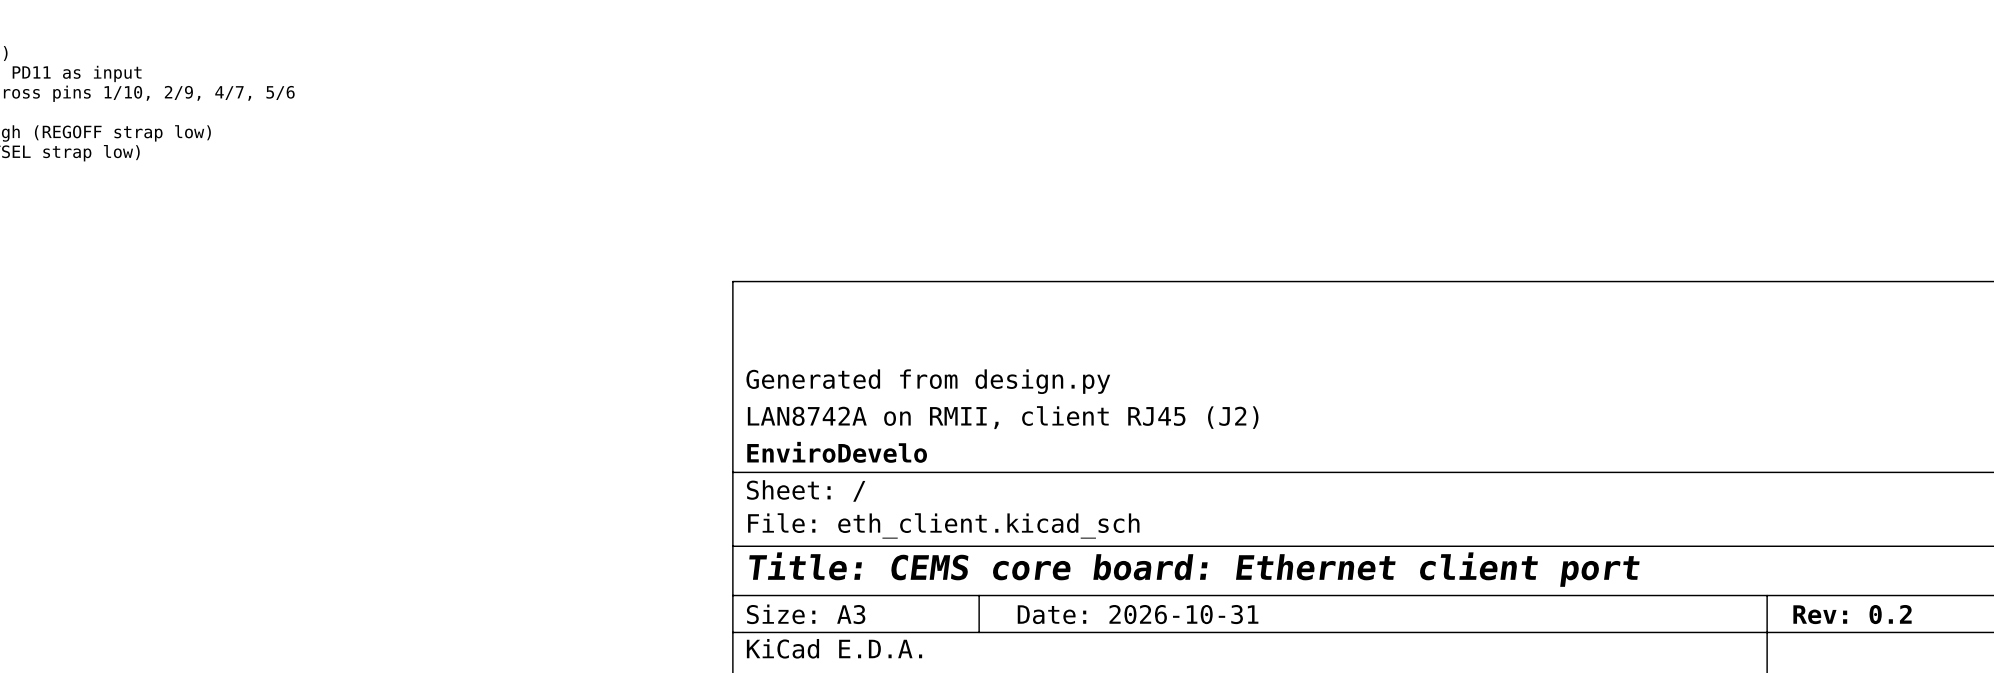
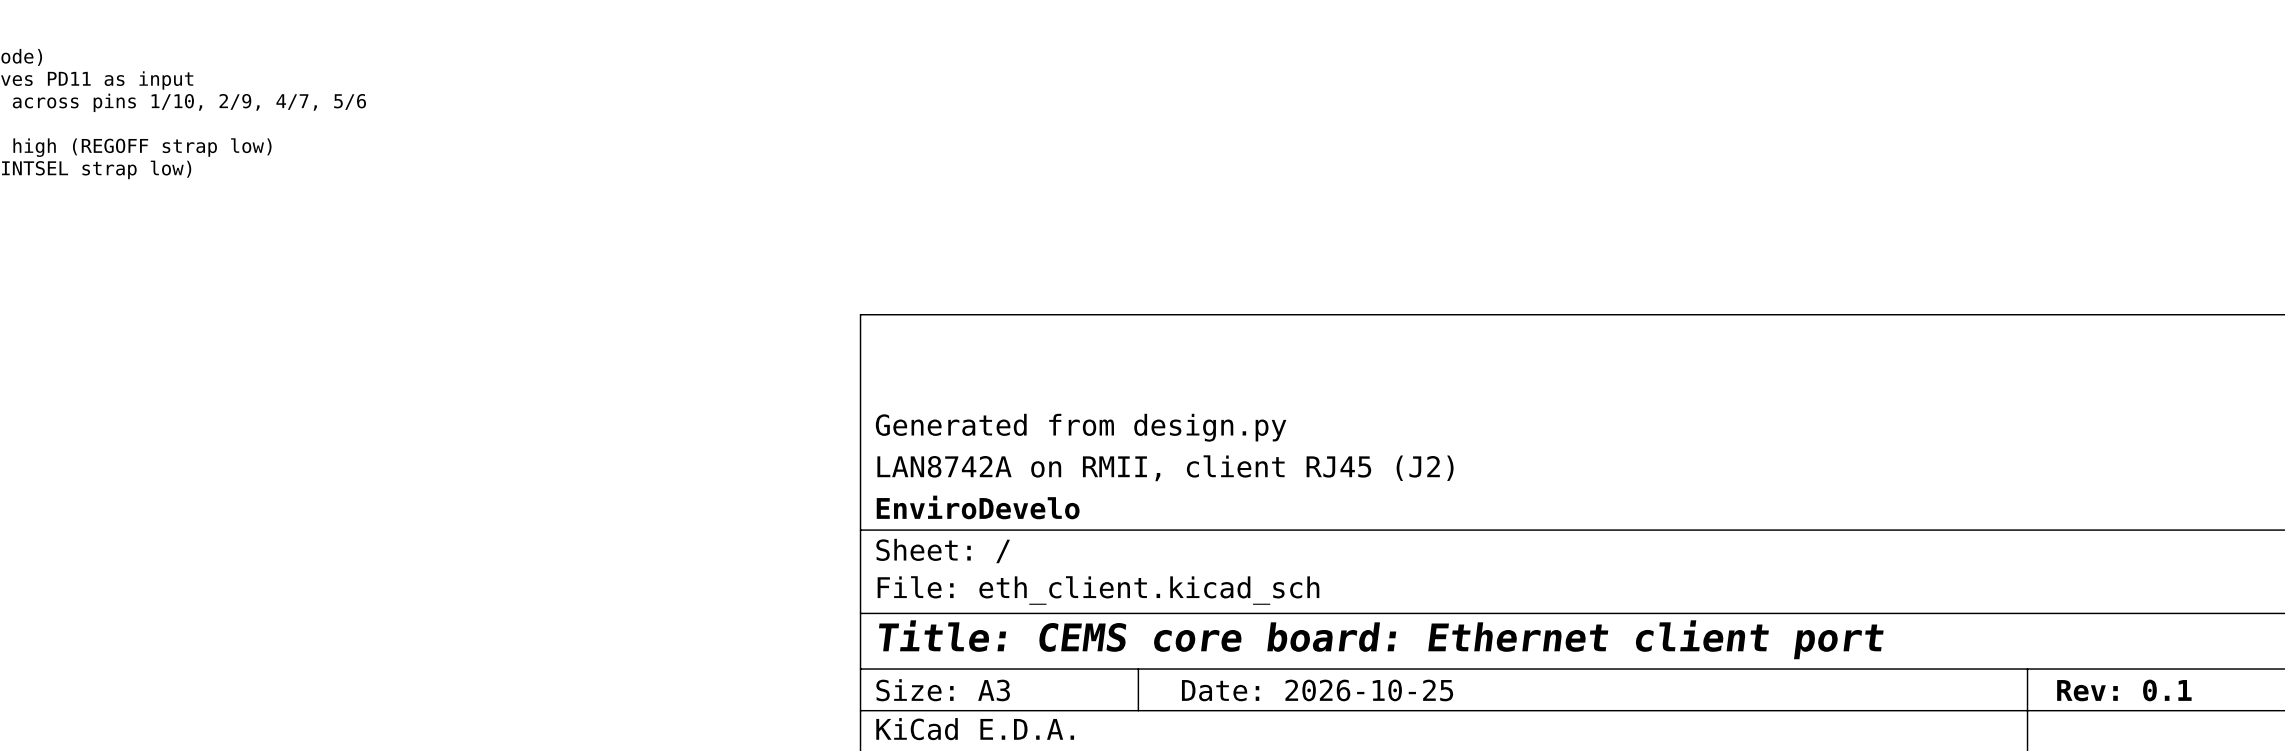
title block: Date: 2026-10-31 (1138, 614) -> Date: 2026-10-25 (1317, 690)
title block: Rev: 0.2 (1852, 614) -> Rev: 0.1 (2124, 690)

